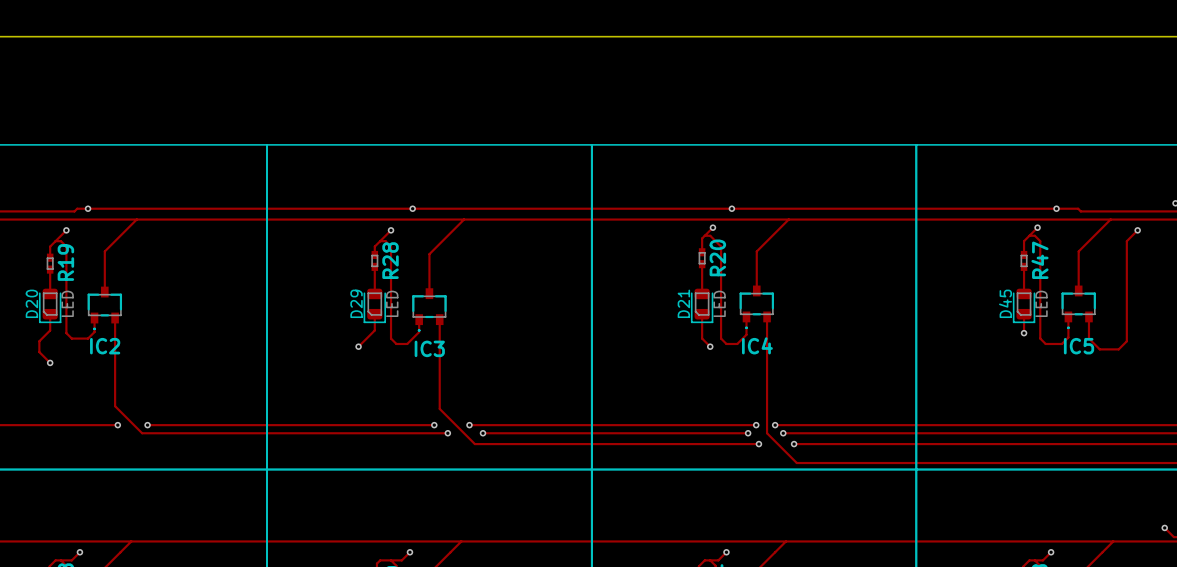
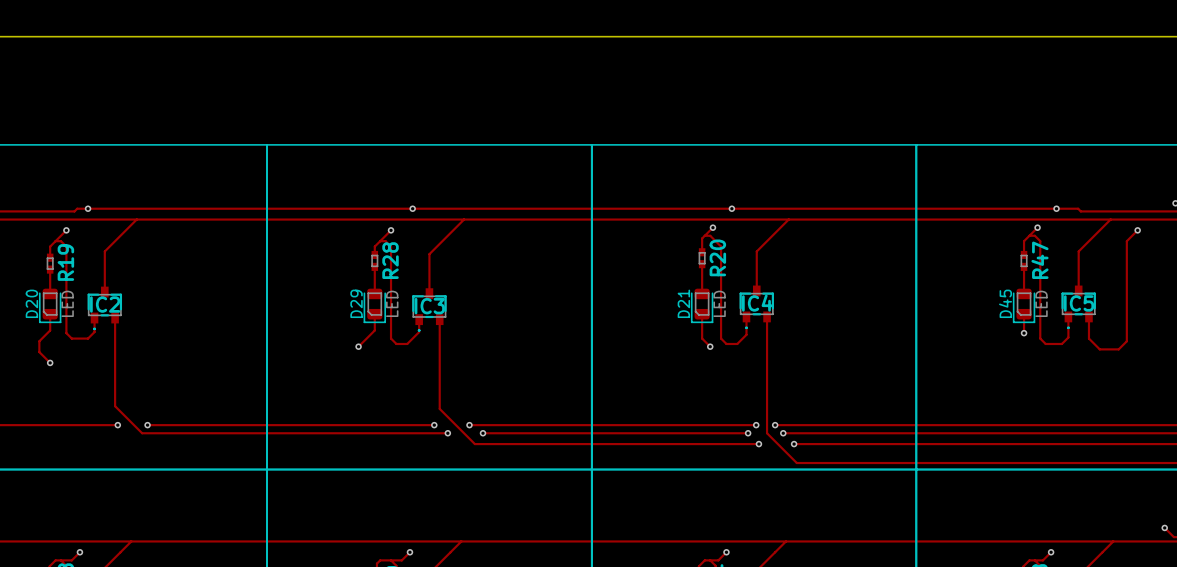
IC4 name position: IC4 (757, 345) -> IC4 (757, 303)
IC2 name position: IC2 (105, 346) -> IC2 (105, 304)
IC5 name position: IC5 (1079, 346) -> IC5 (1079, 303)
IC3 name position: IC3 (429, 348) -> IC3 (429, 306)

